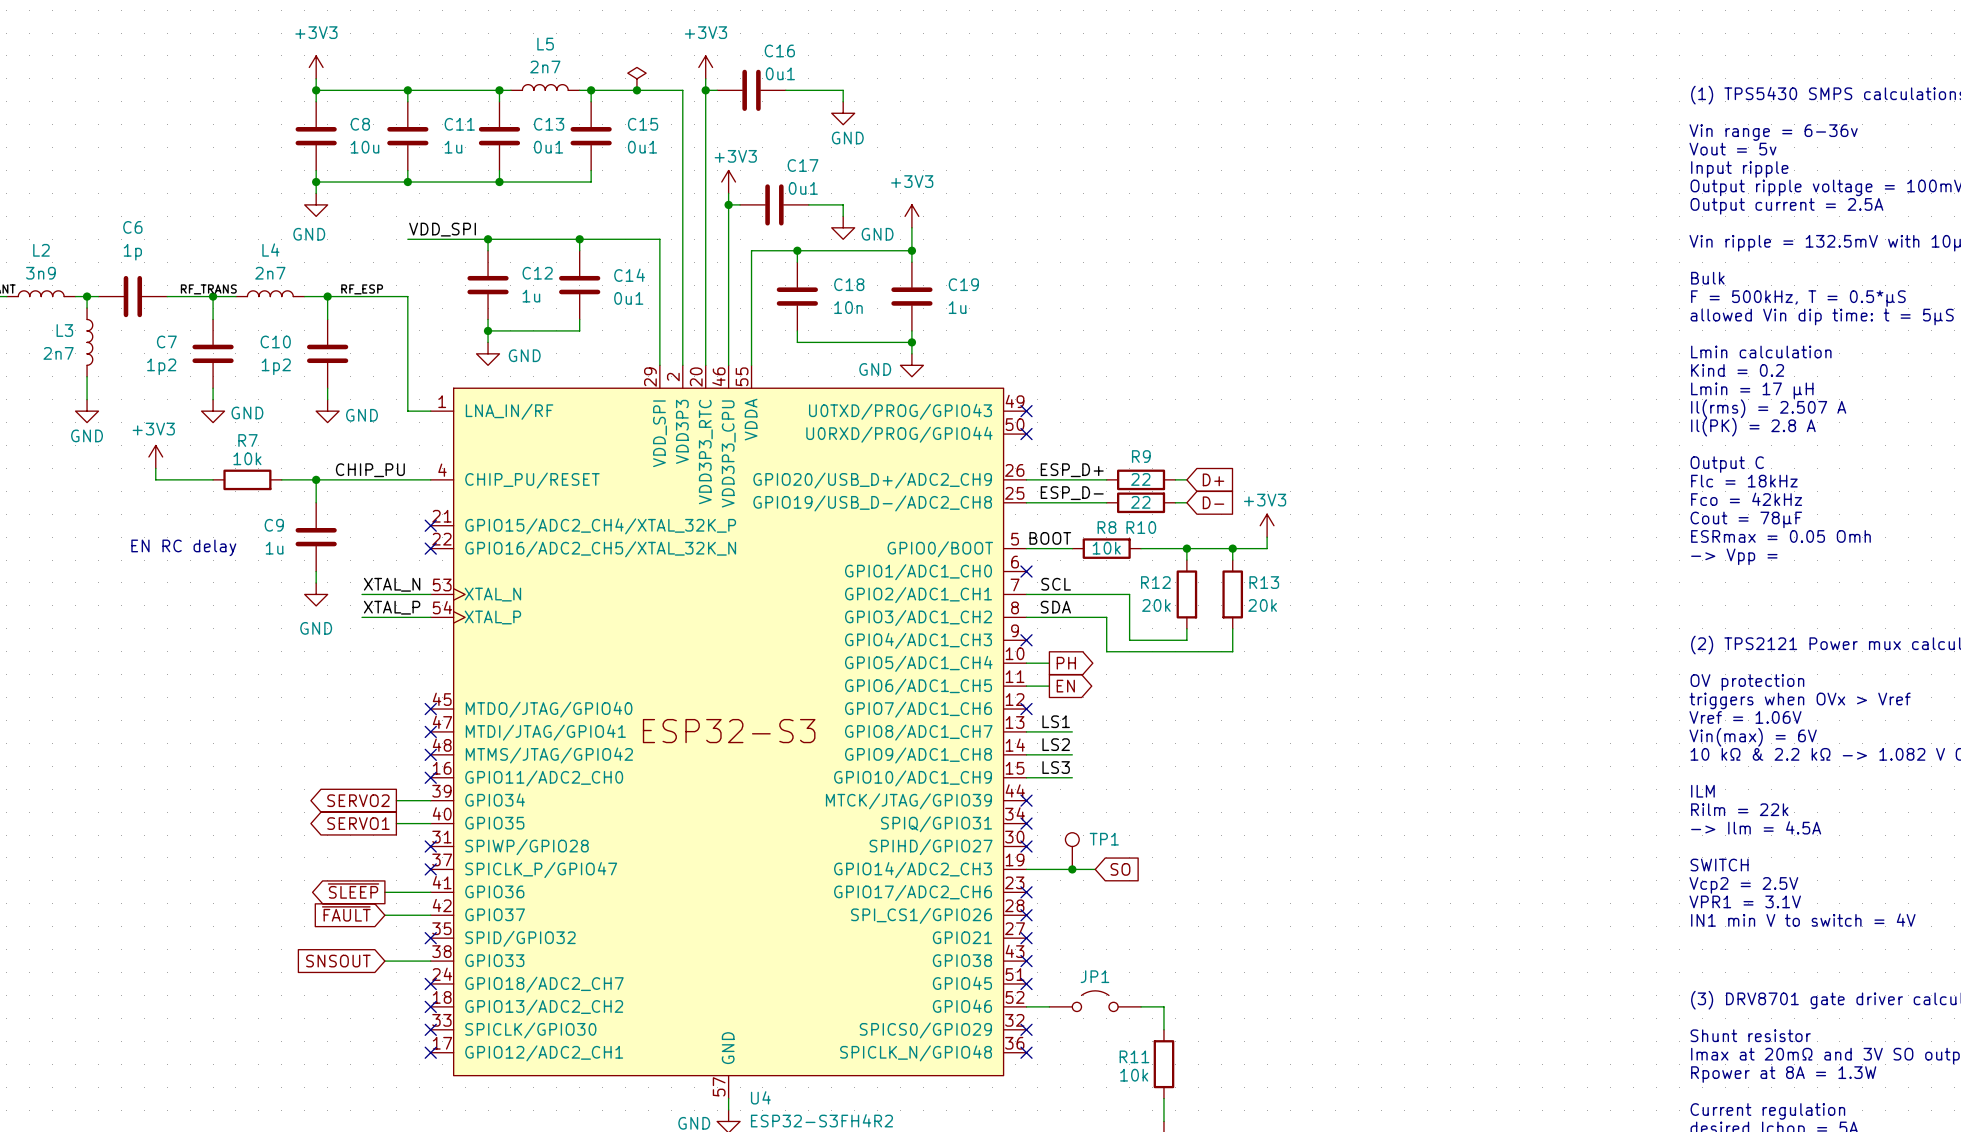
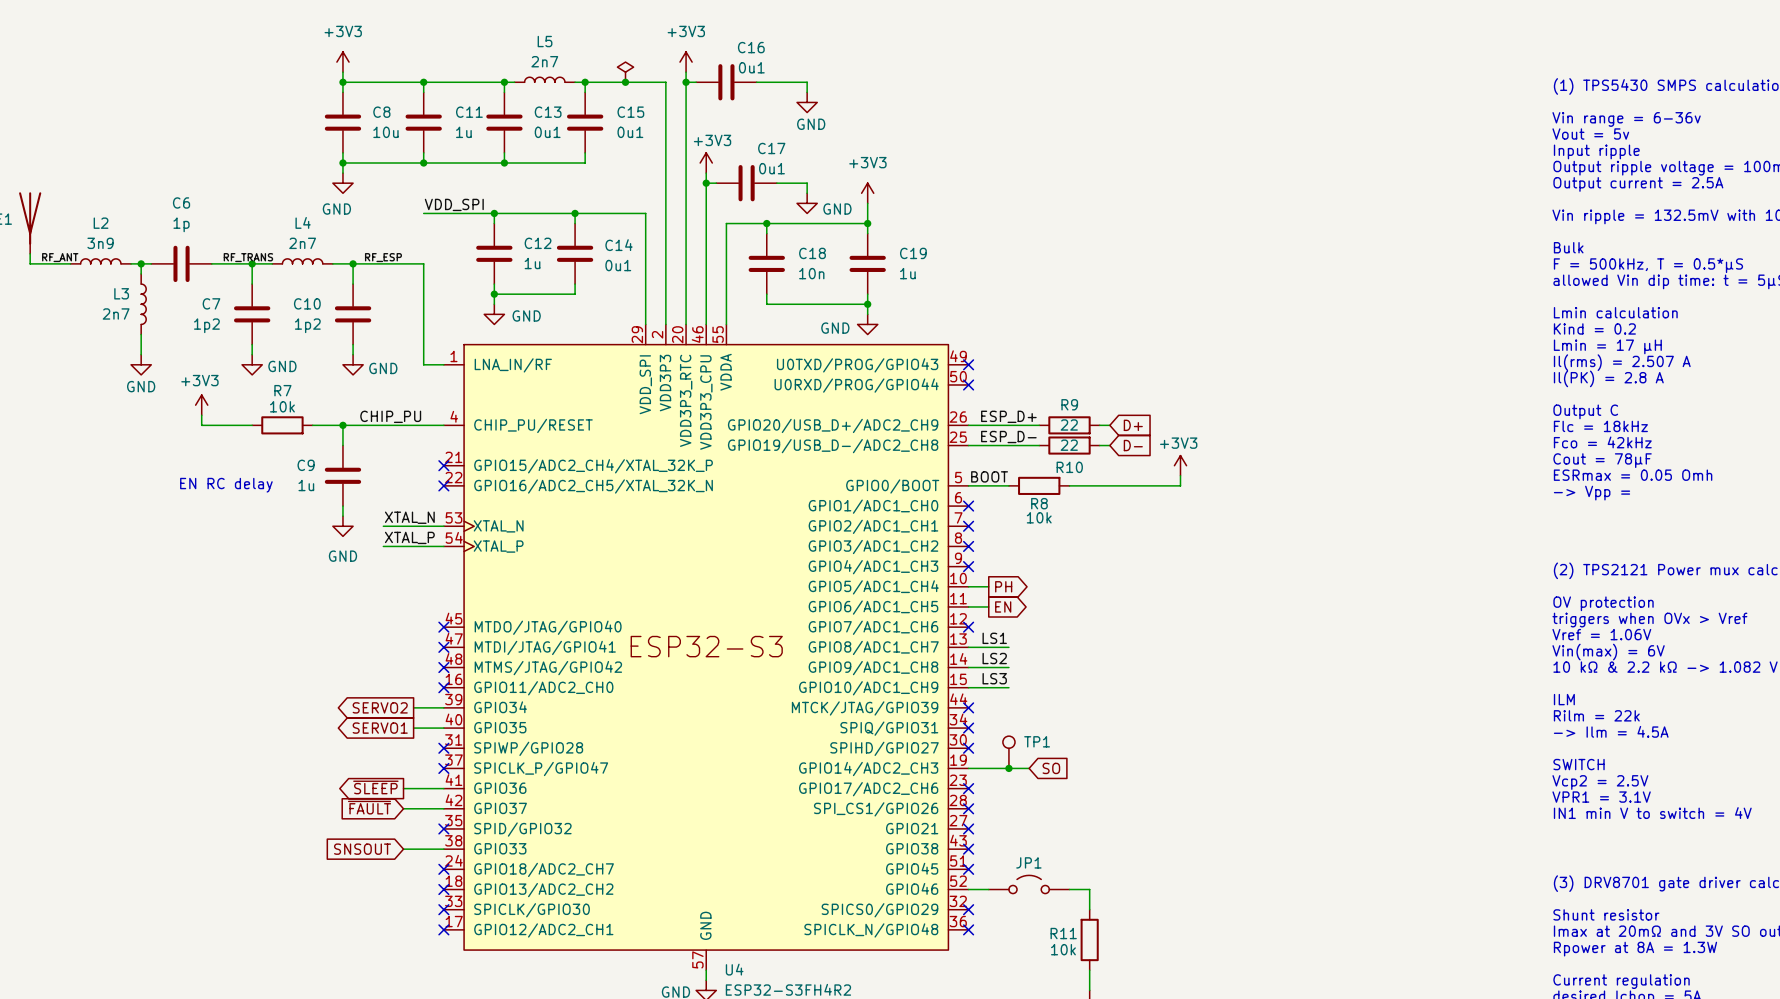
R8 name position: R8 (1106, 527) -> R8 (1039, 503)
R8 value position: 10k (1106, 548) -> 10k (1039, 517)
wire: (1186, 548) (1186, 560) -> none
junction: (1186, 548) -> none
wire: (1232, 548) (1232, 560) -> none
junction: (1232, 548) -> none
label: SCL (1056, 584) -> none
wire: (1026, 594) (1129, 594) (1129, 640) (1186, 640) (1186, 628) -> none
no-connect mark: none -> (968, 526)
R12: 20k (1186, 594) -> none
R13: 20k (1232, 594) -> none
label: SDA (1055, 607) -> none
wire: (1026, 617) (1106, 617) (1106, 651) (1232, 651) (1232, 628) -> none
no-connect mark: none -> (968, 546)

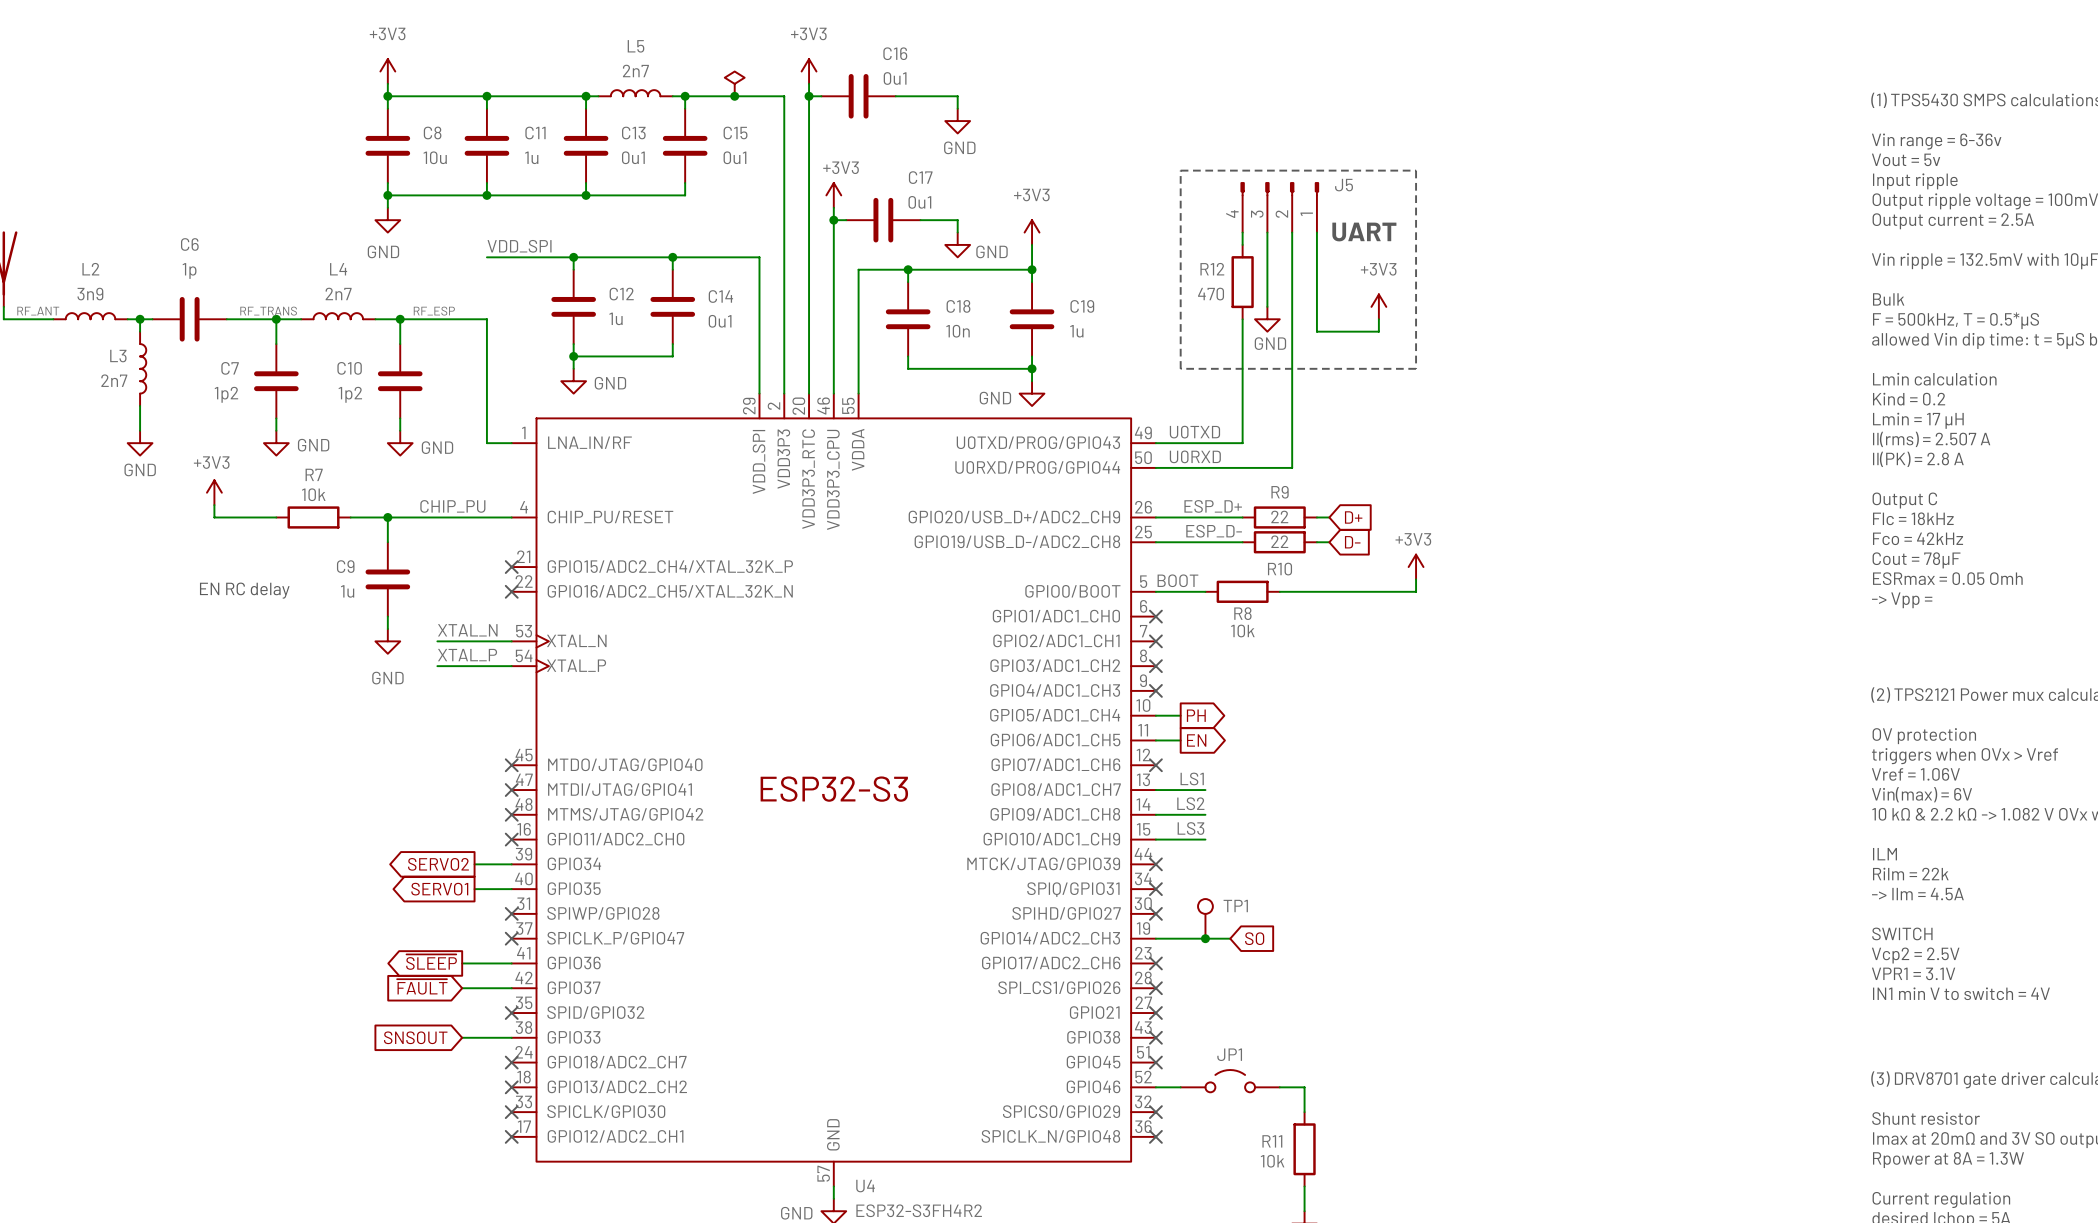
line: none -> (1180, 170) (1416, 170) (1416, 368) (1180, 368) (1180, 170)
J5: none -> (1279, 207)
text: none -> UART (1364, 232)
wire: none -> (1242, 232) (1242, 244)
wire: none -> (1267, 232) (1267, 306)
wire: none -> (1292, 232) (1292, 467) (1155, 467)
wire: none -> (1316, 232) (1316, 331) (1378, 331) (1378, 319)
R12: none -> 470 (1242, 282)
power symbol: none -> +3V3 (1378, 306)
wire: none -> (1242, 319) (1242, 443) (1155, 443)
power symbol: none -> GND (1267, 319)
label: none -> U0TXD (1194, 432)
no-connect mark: (968, 364) -> none
label: none -> U0RXD (1195, 456)
no-connect mark: (968, 384) -> none

